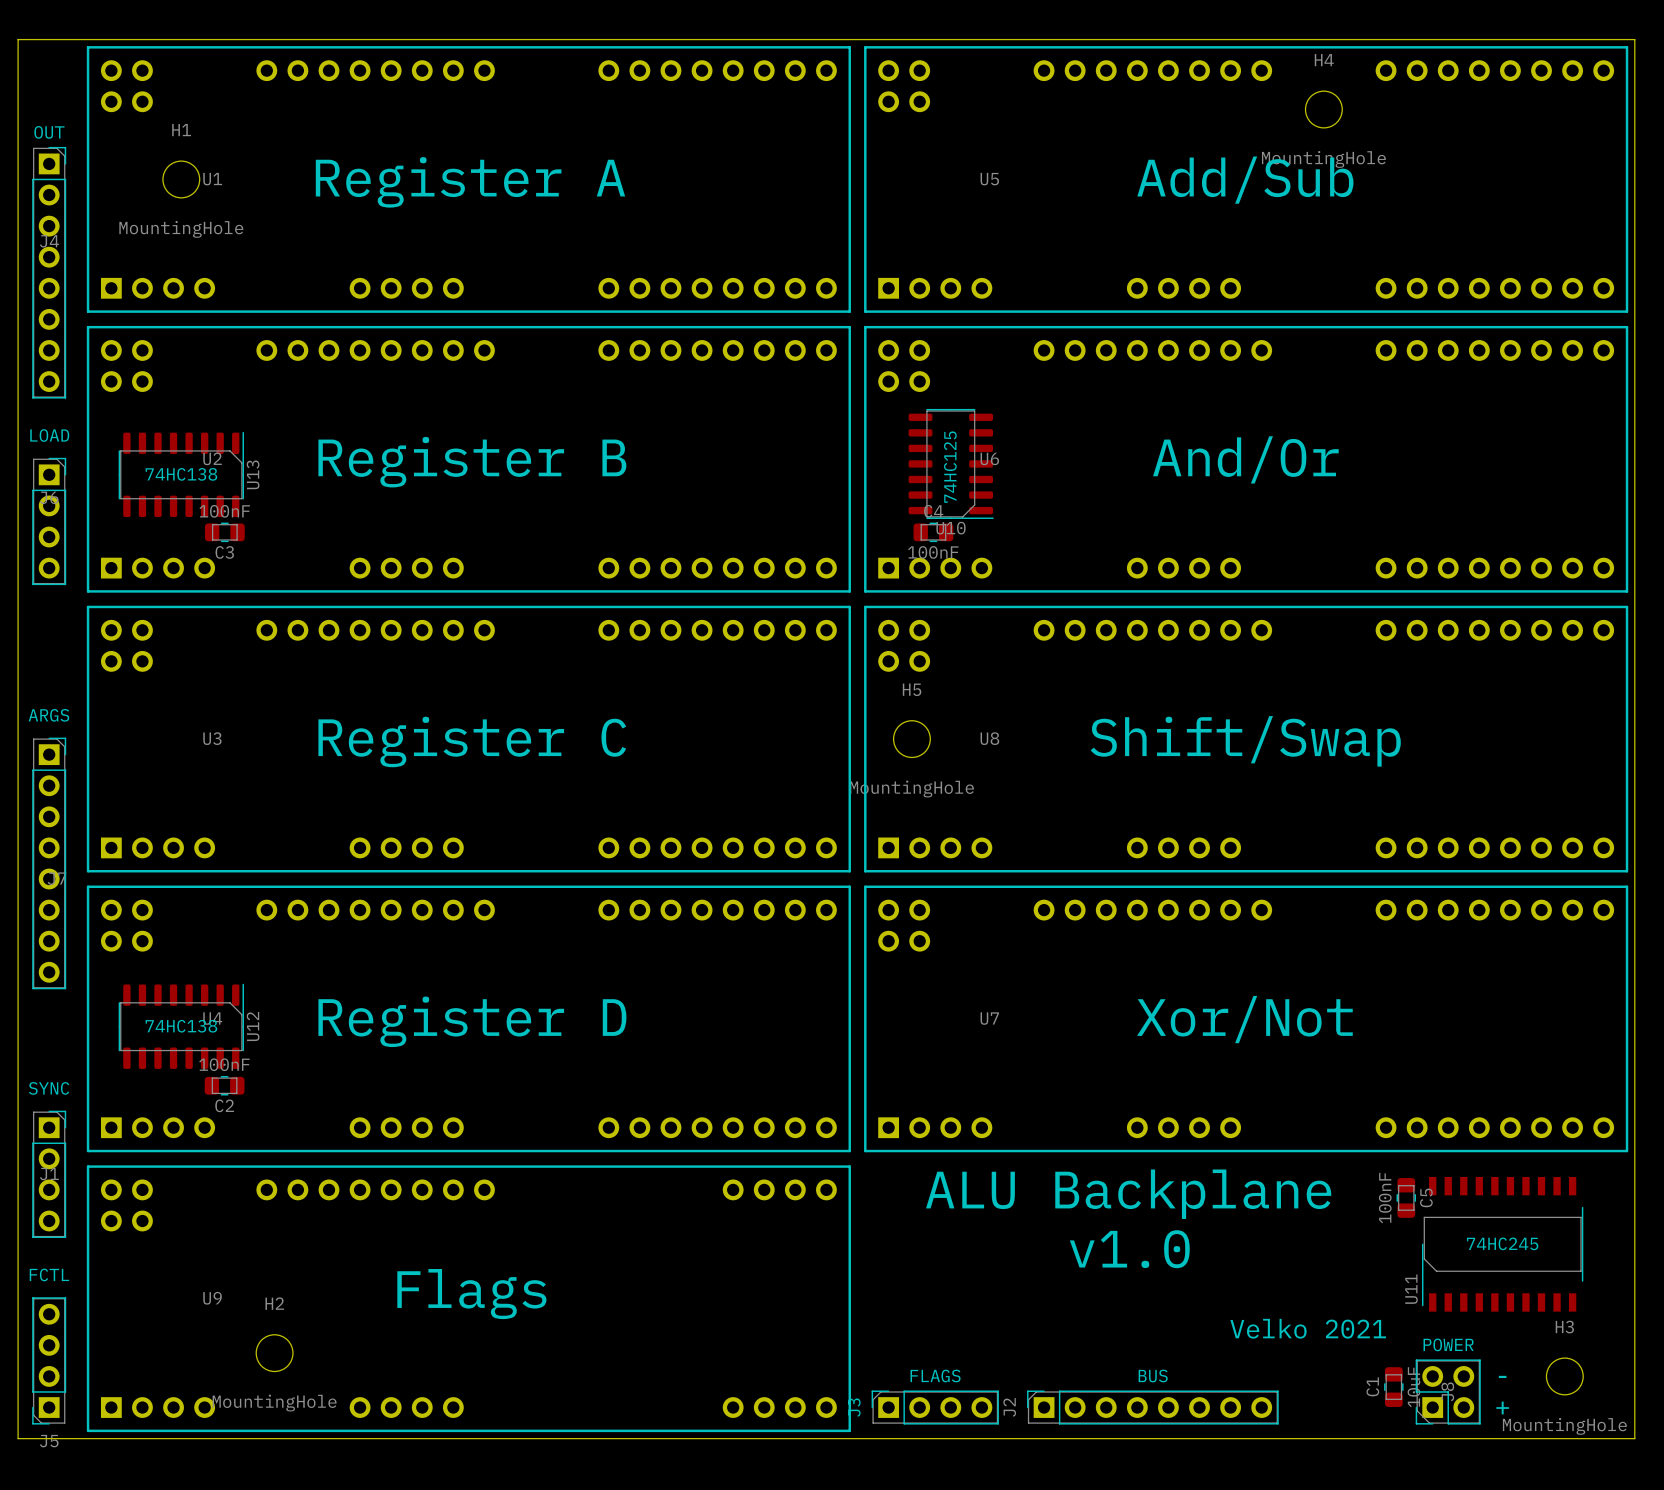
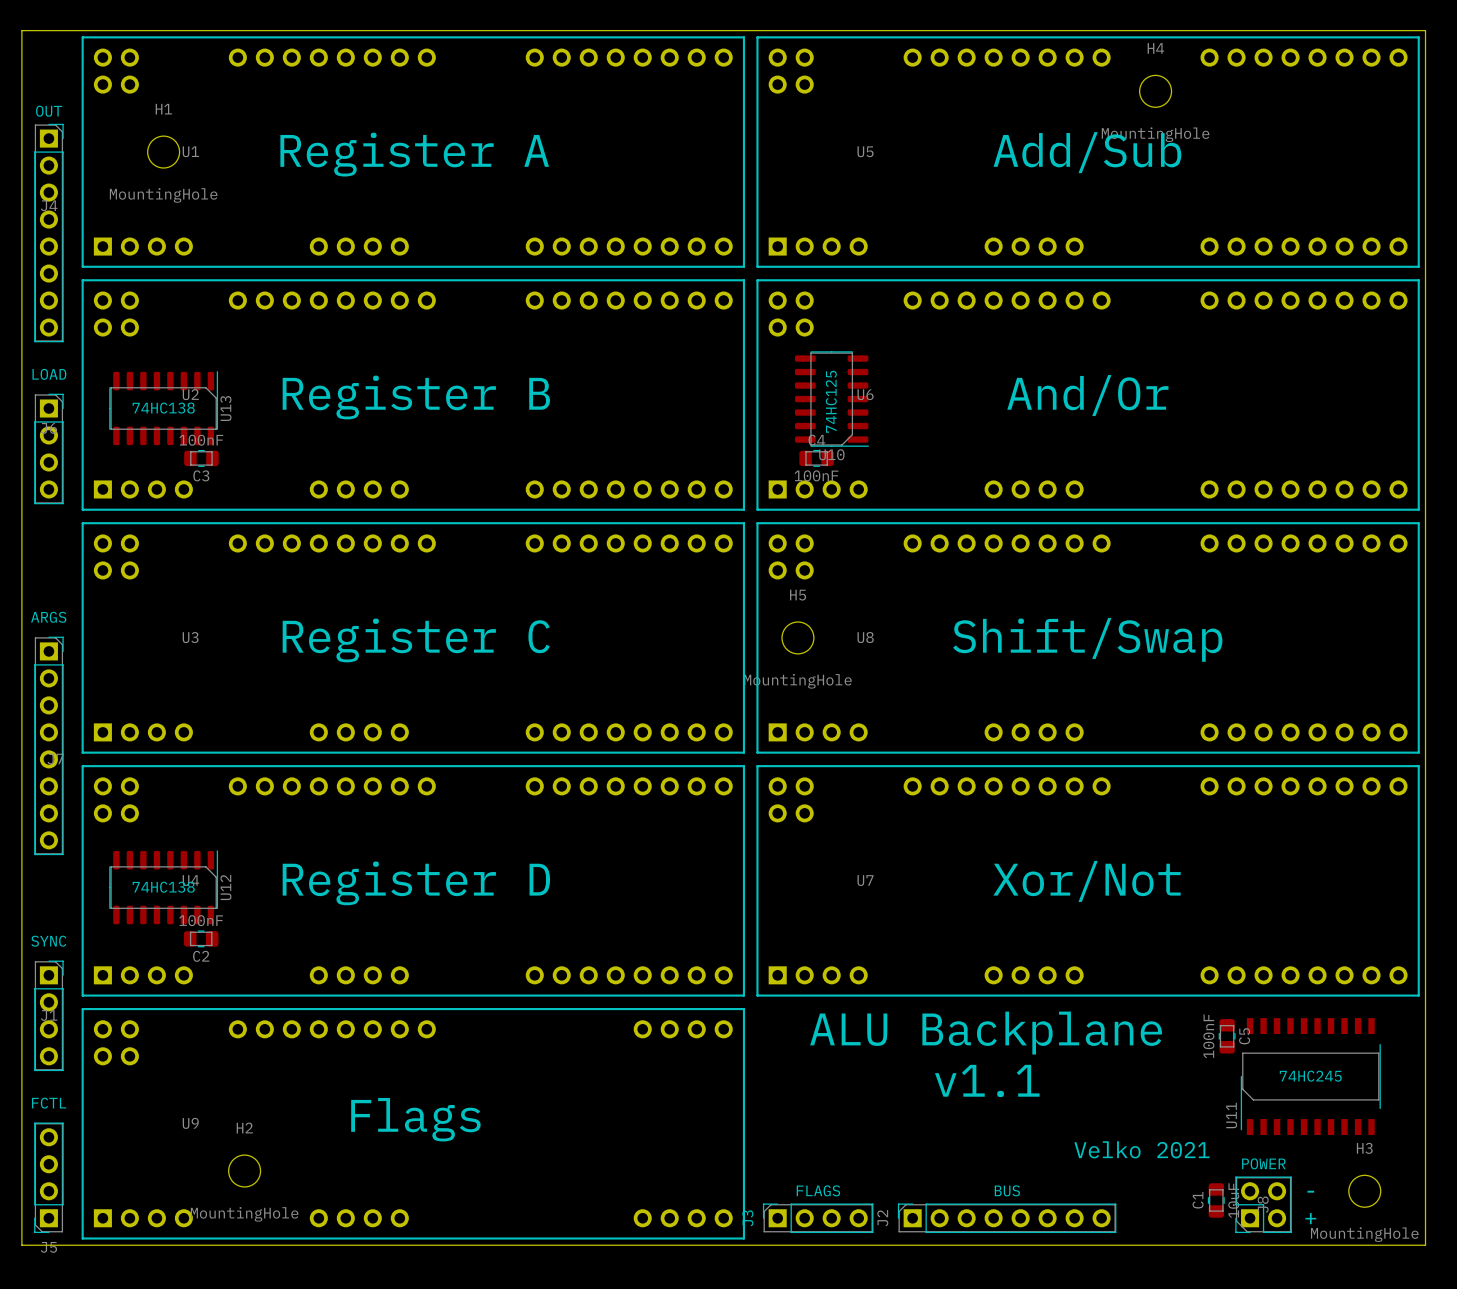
text: v1.0 (1129, 1249) -> v1.1 (987, 1080)

